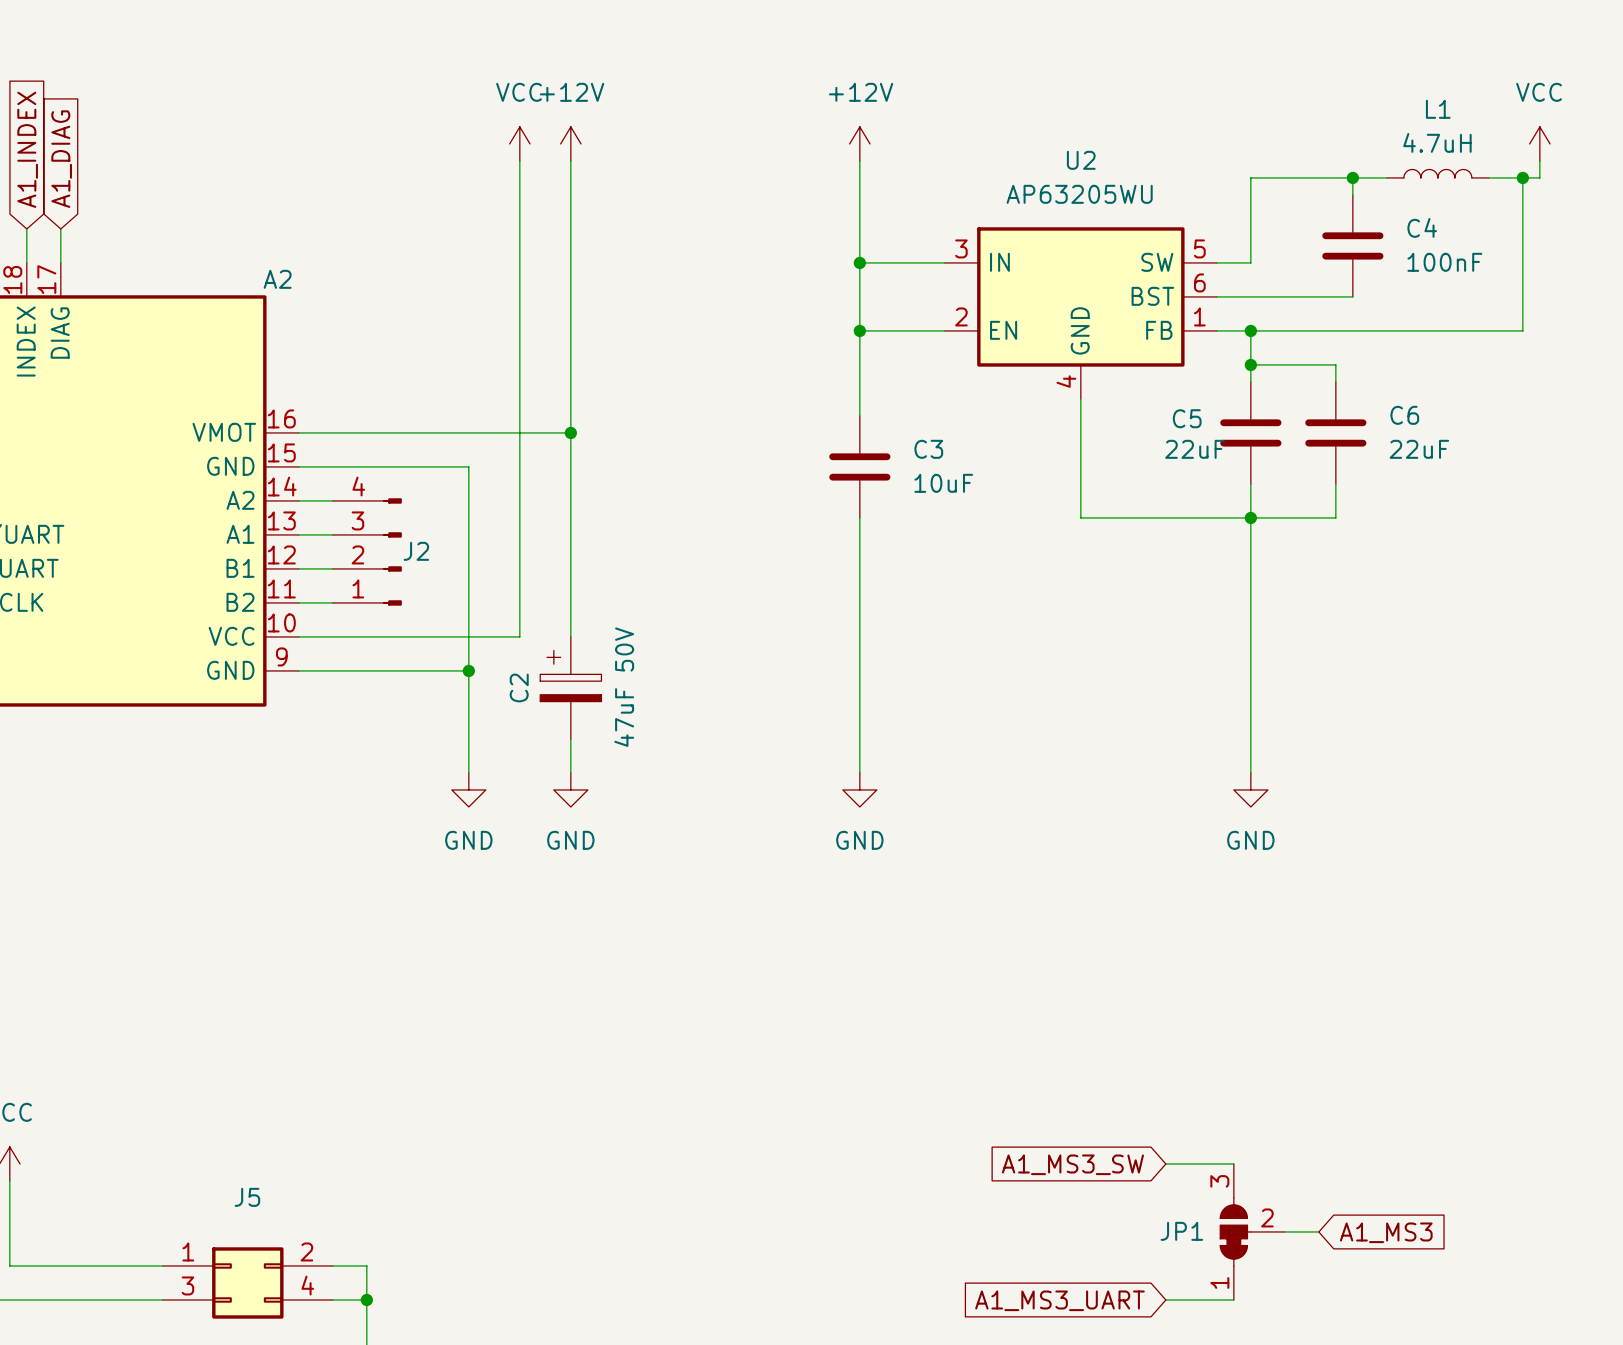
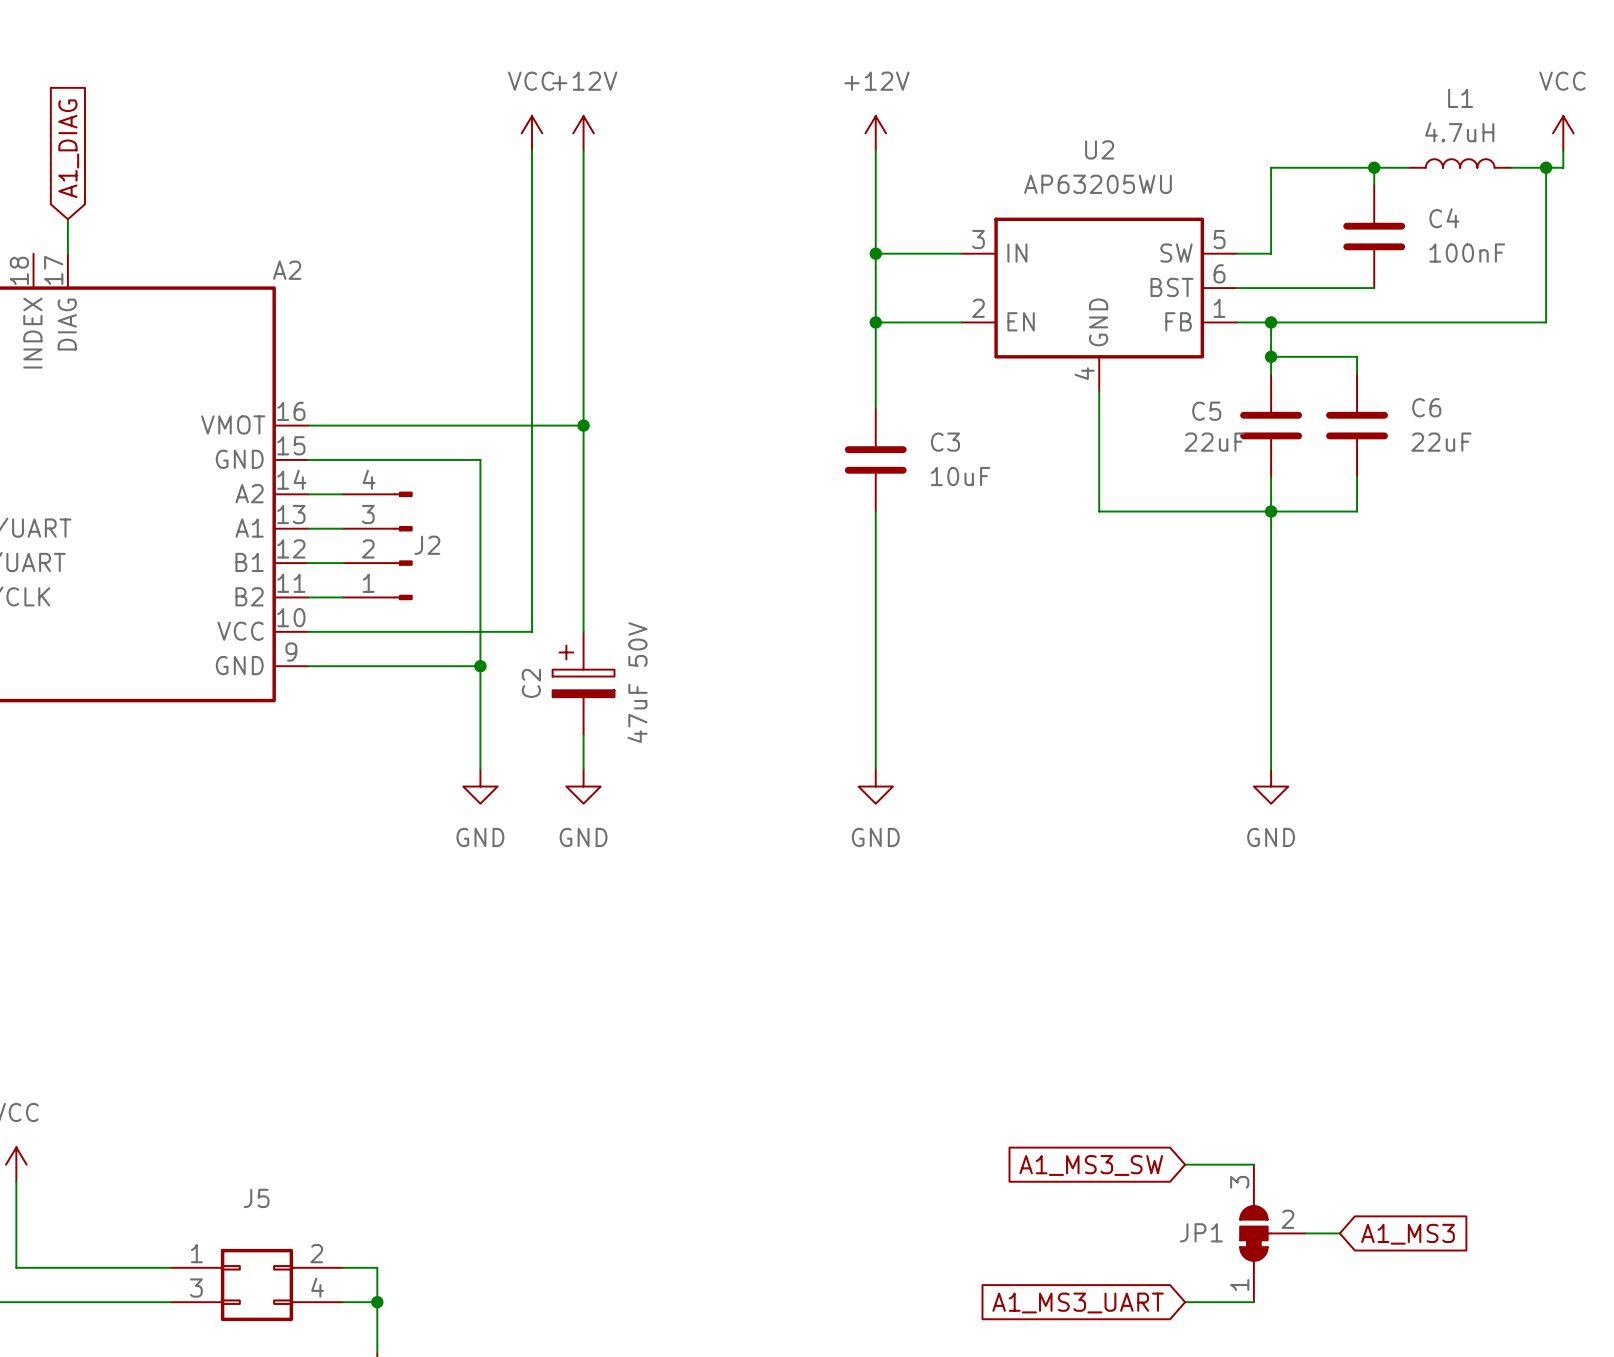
global label: A1_INDEX (27, 149) -> none
wire: (26, 228) (26, 262) -> none

